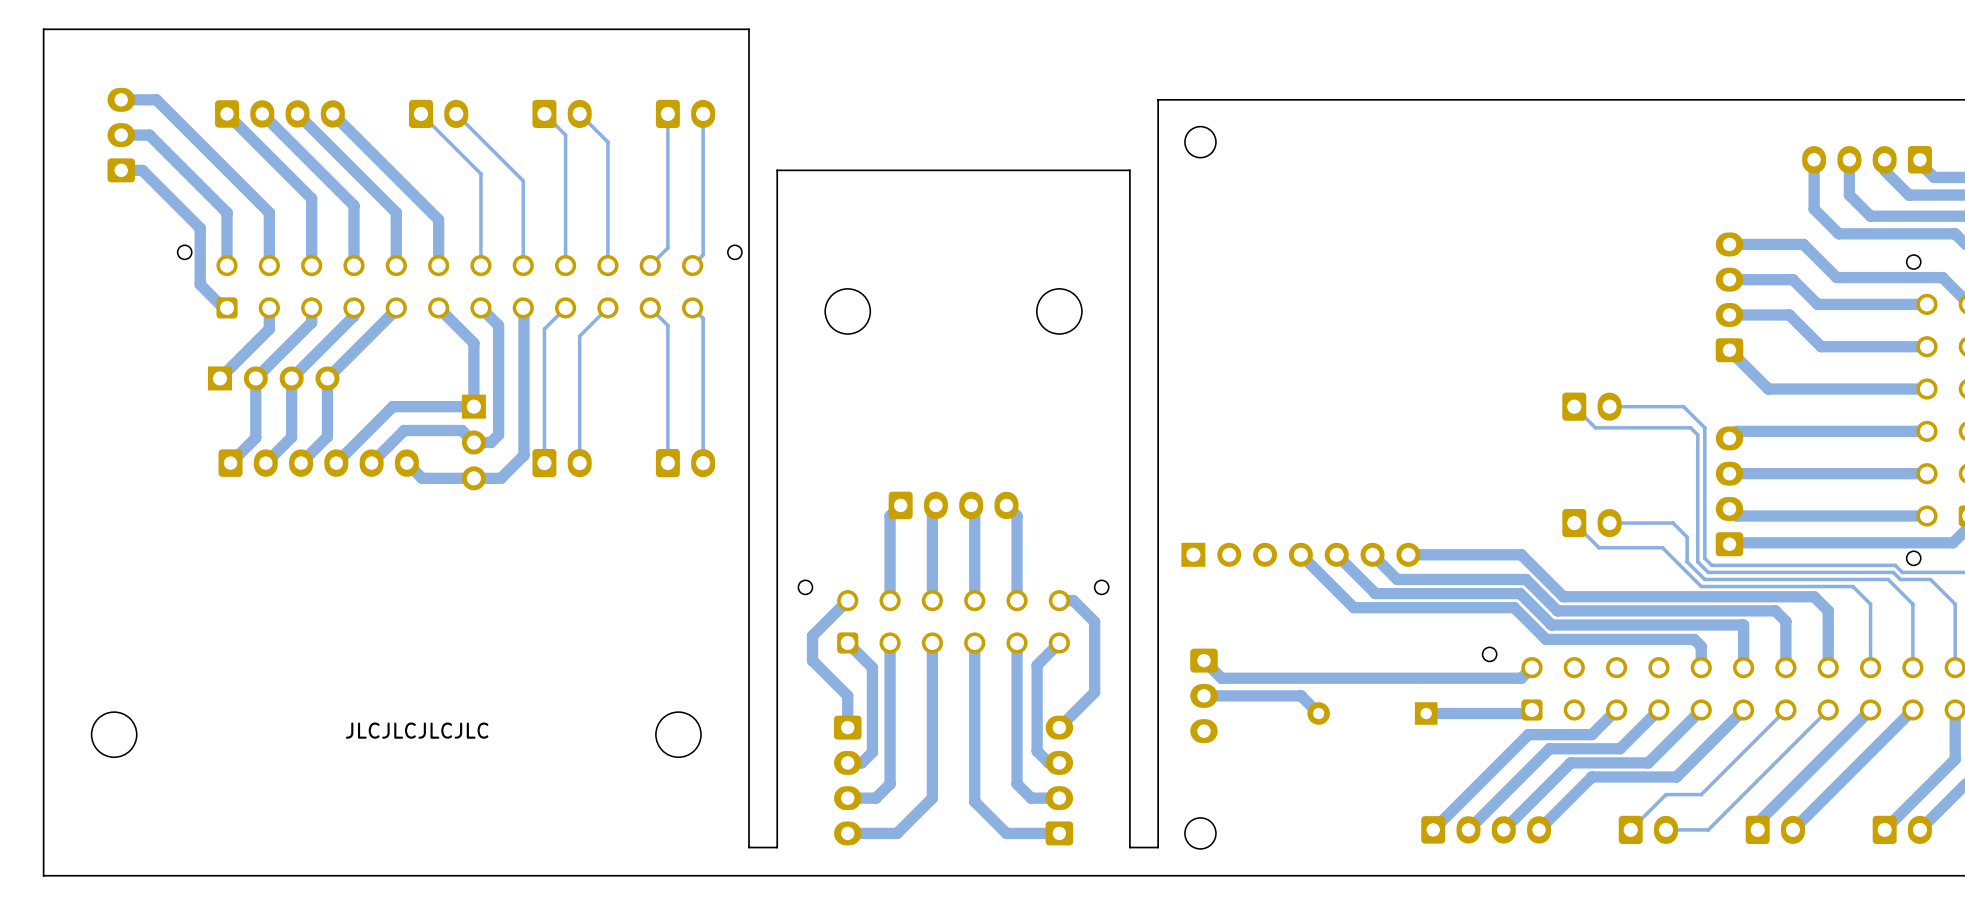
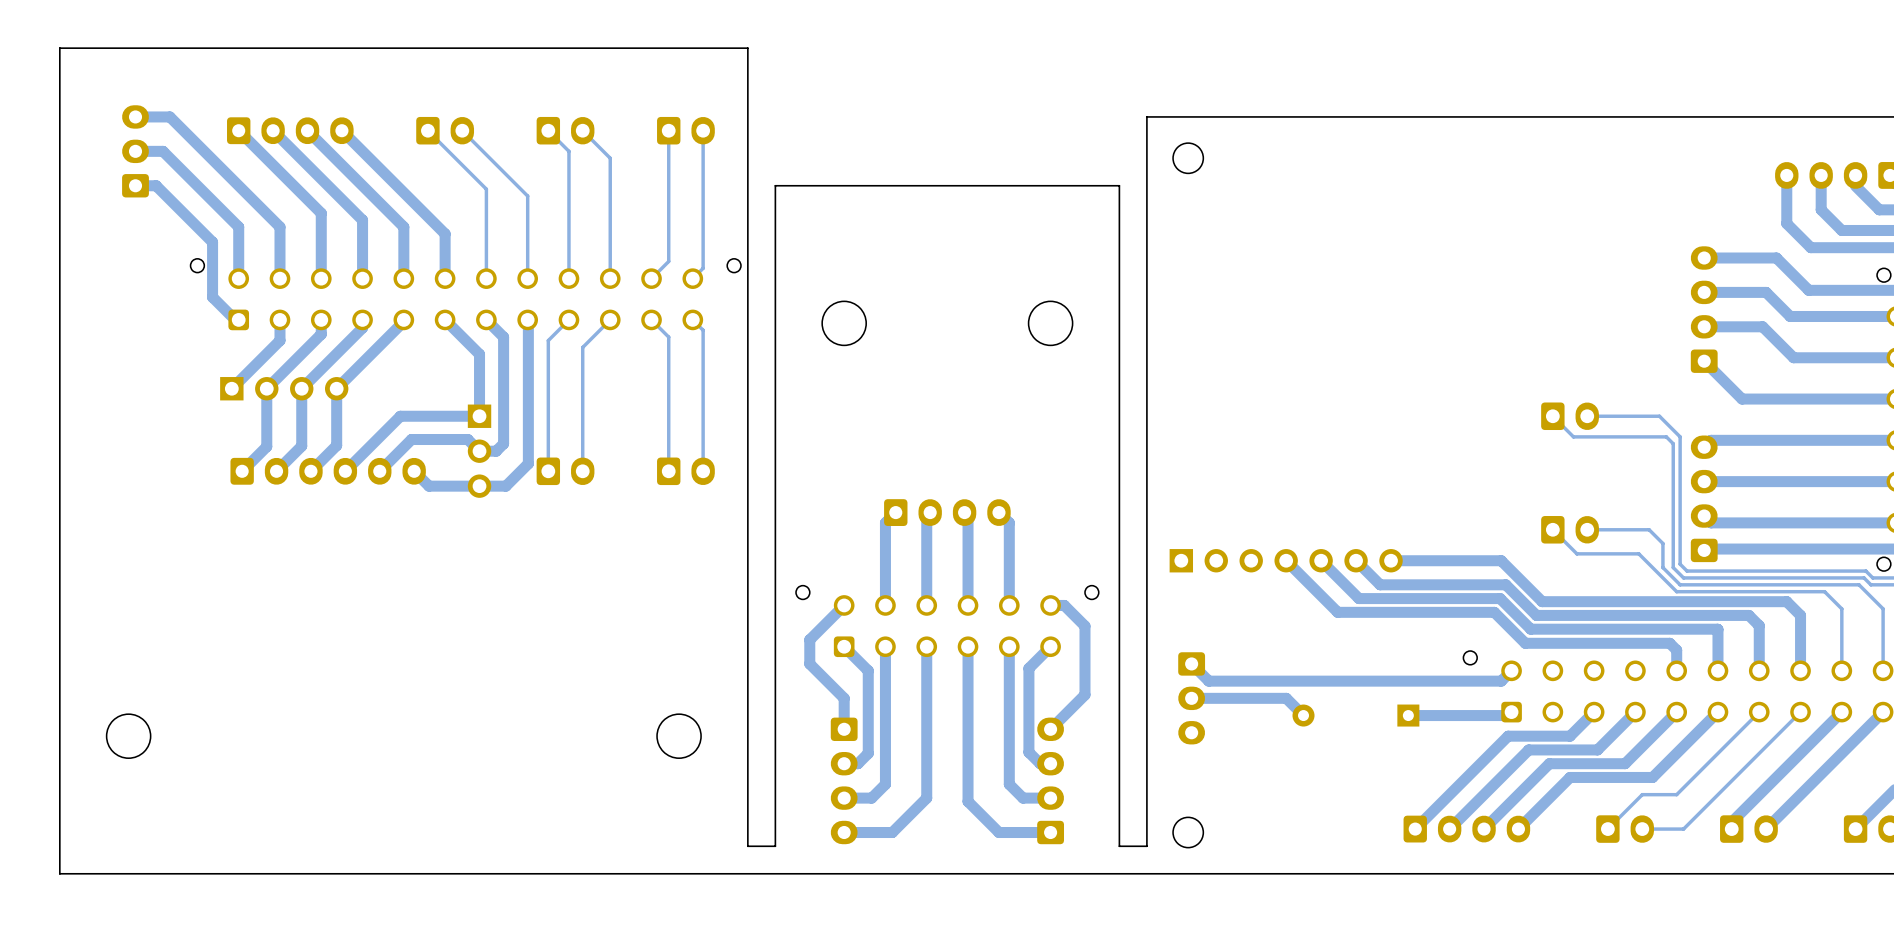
text: JLCJLCJLCJLC (417, 730) -> none

